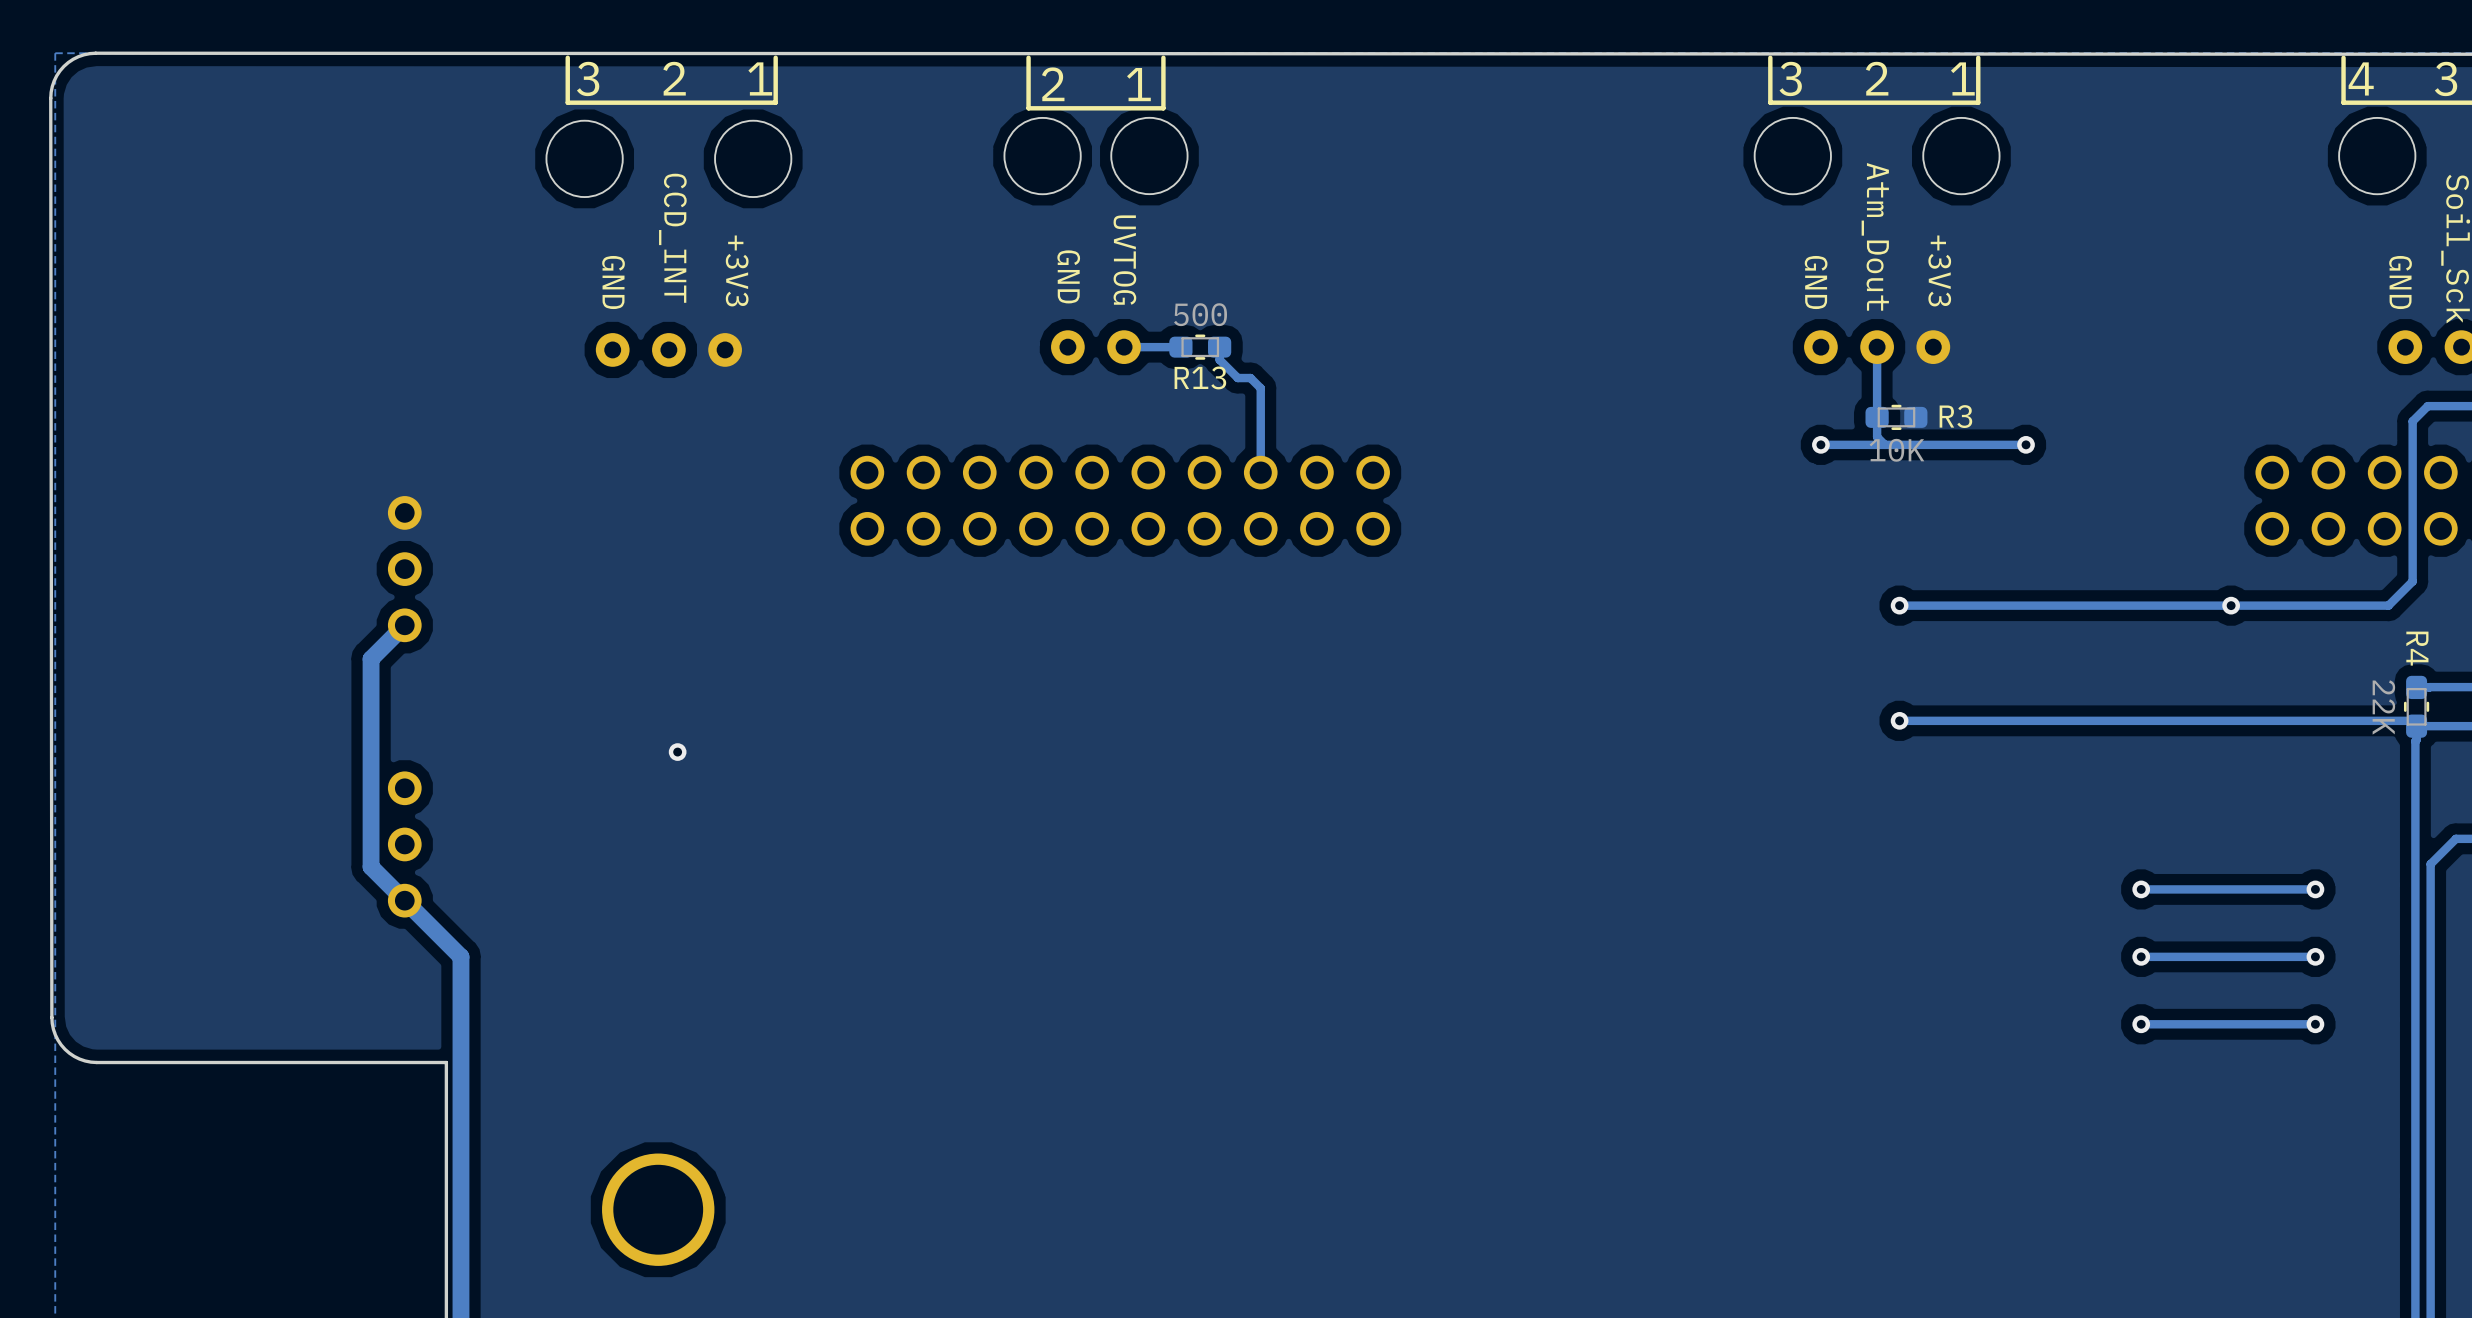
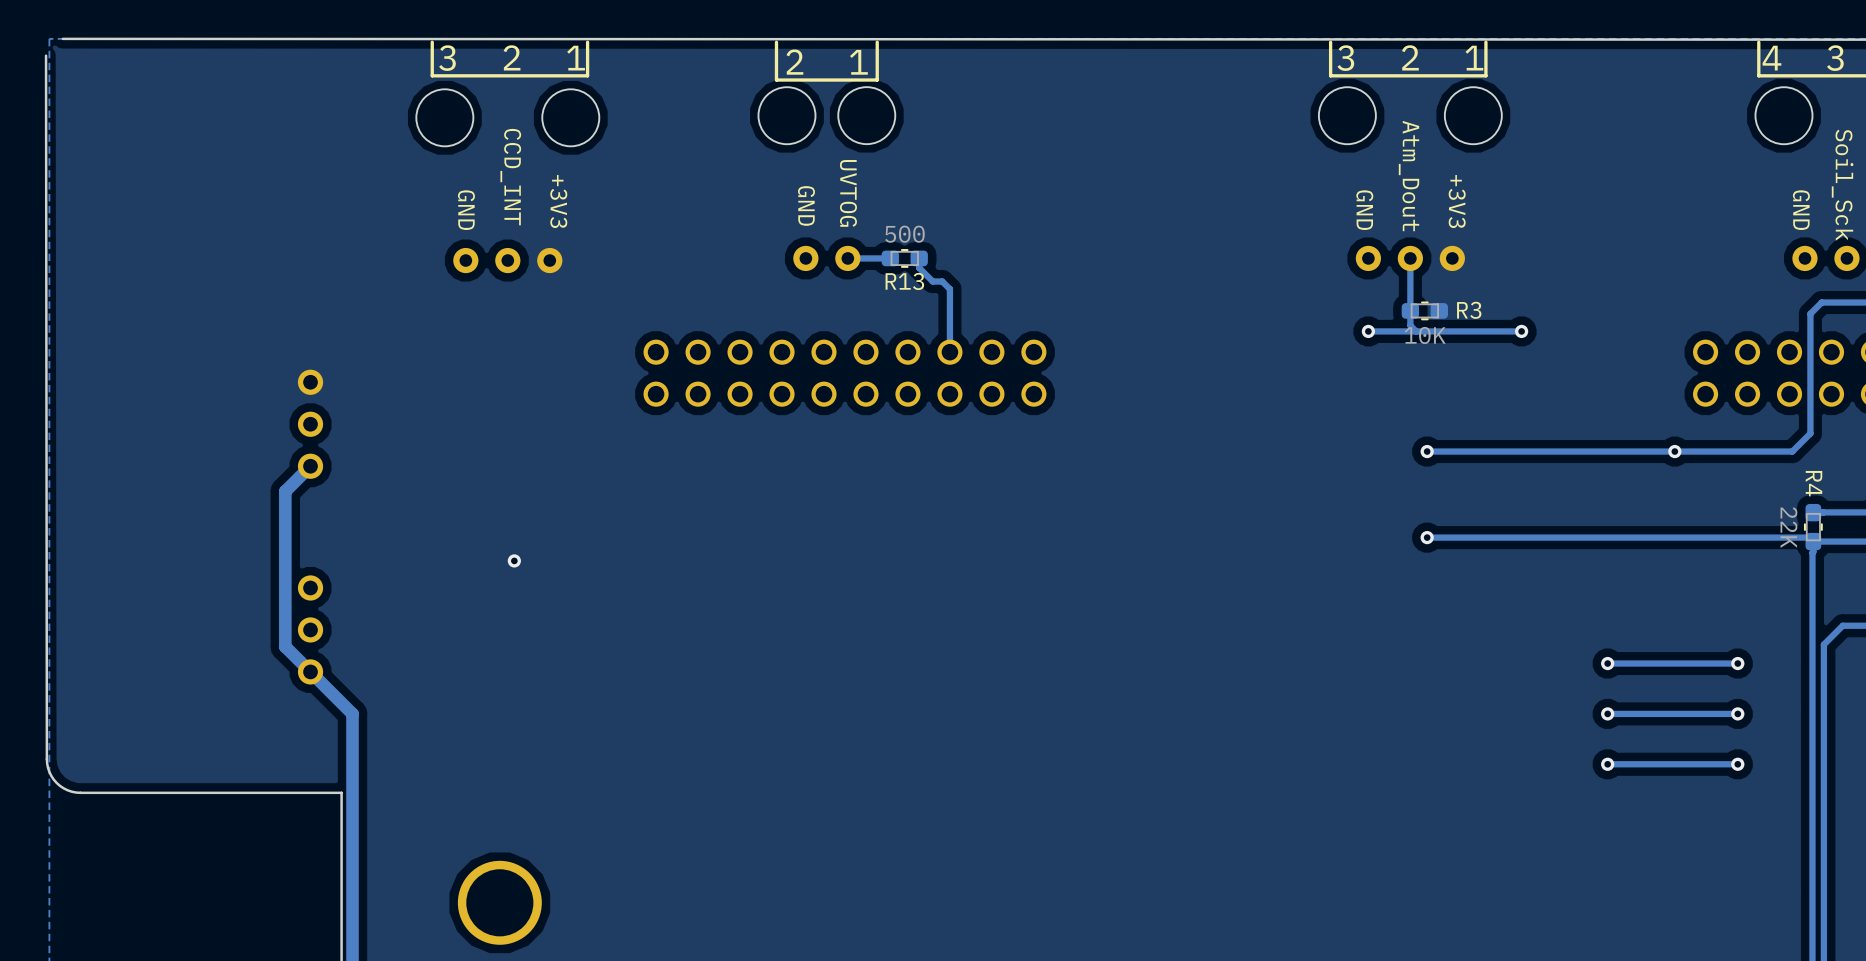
board edge: (95, 53) (78, 56) (63, 66) (54, 80) (50, 98) (51, 1017) -> (46, 55) (46, 759)

